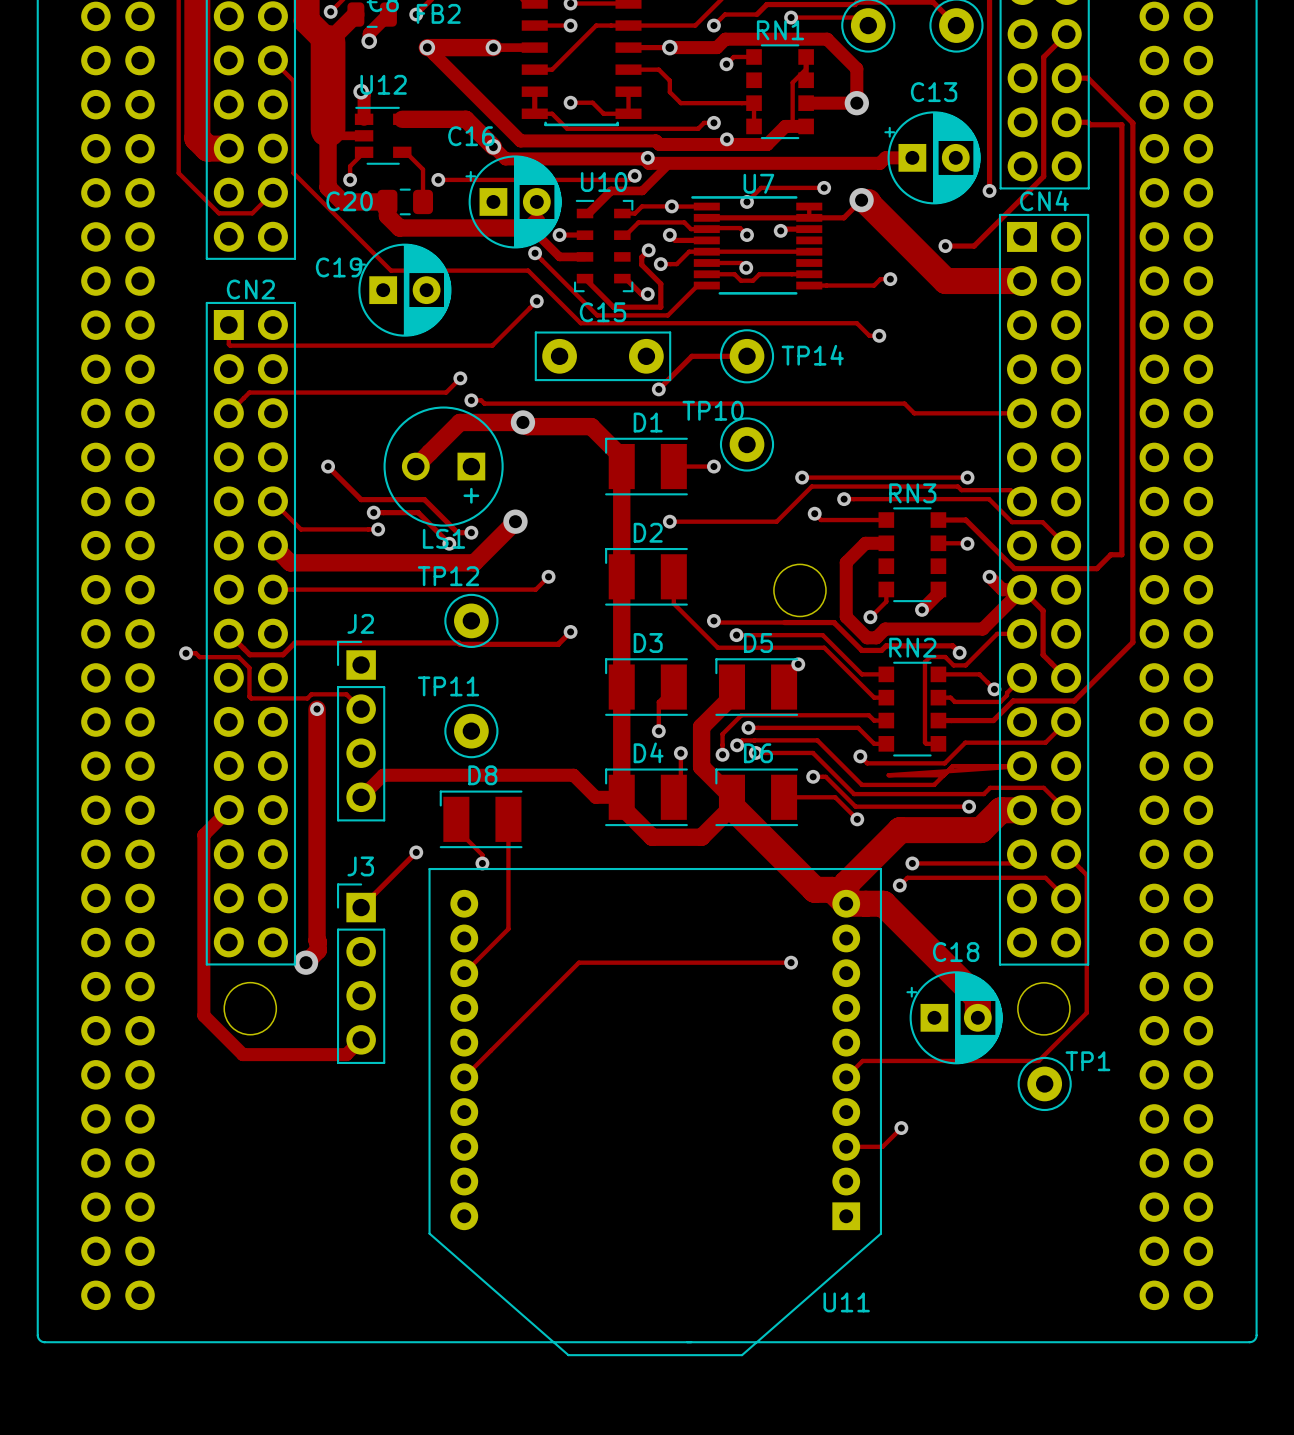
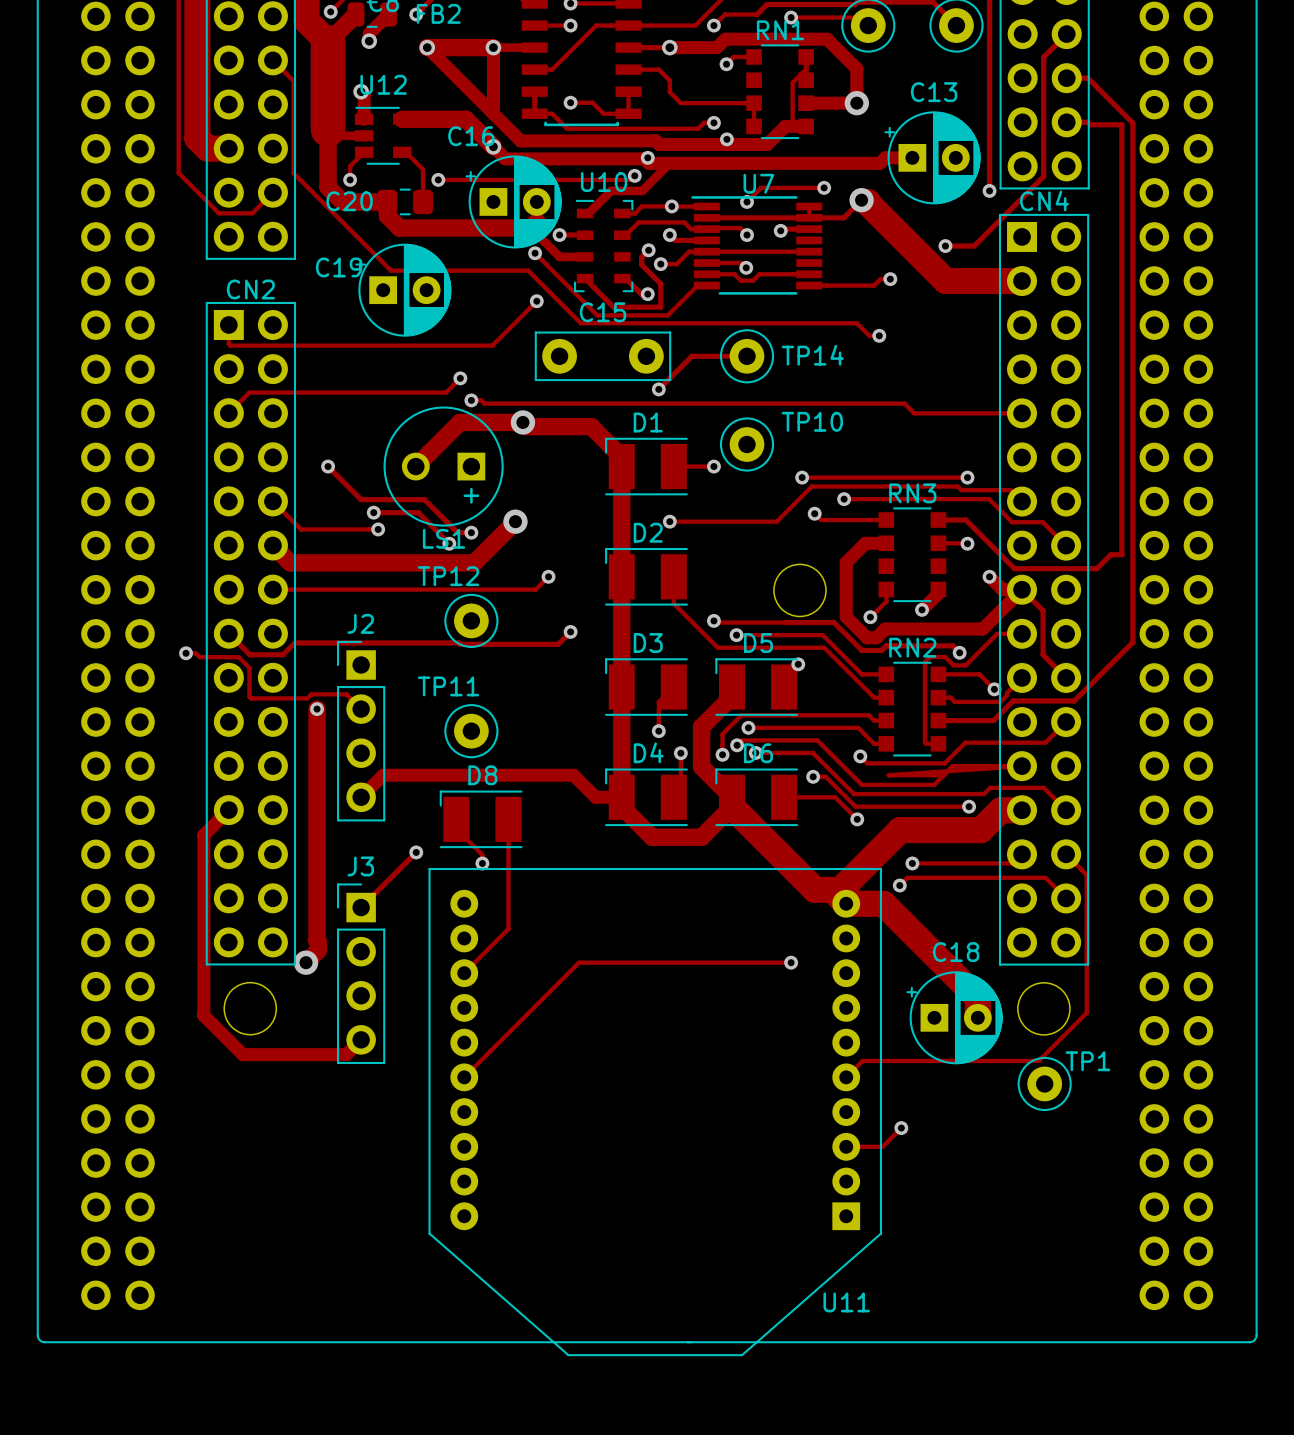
track: none -> (493, 47) (493, 113)
TP10 name position: TP10 (713, 410) -> TP10 (812, 421)

